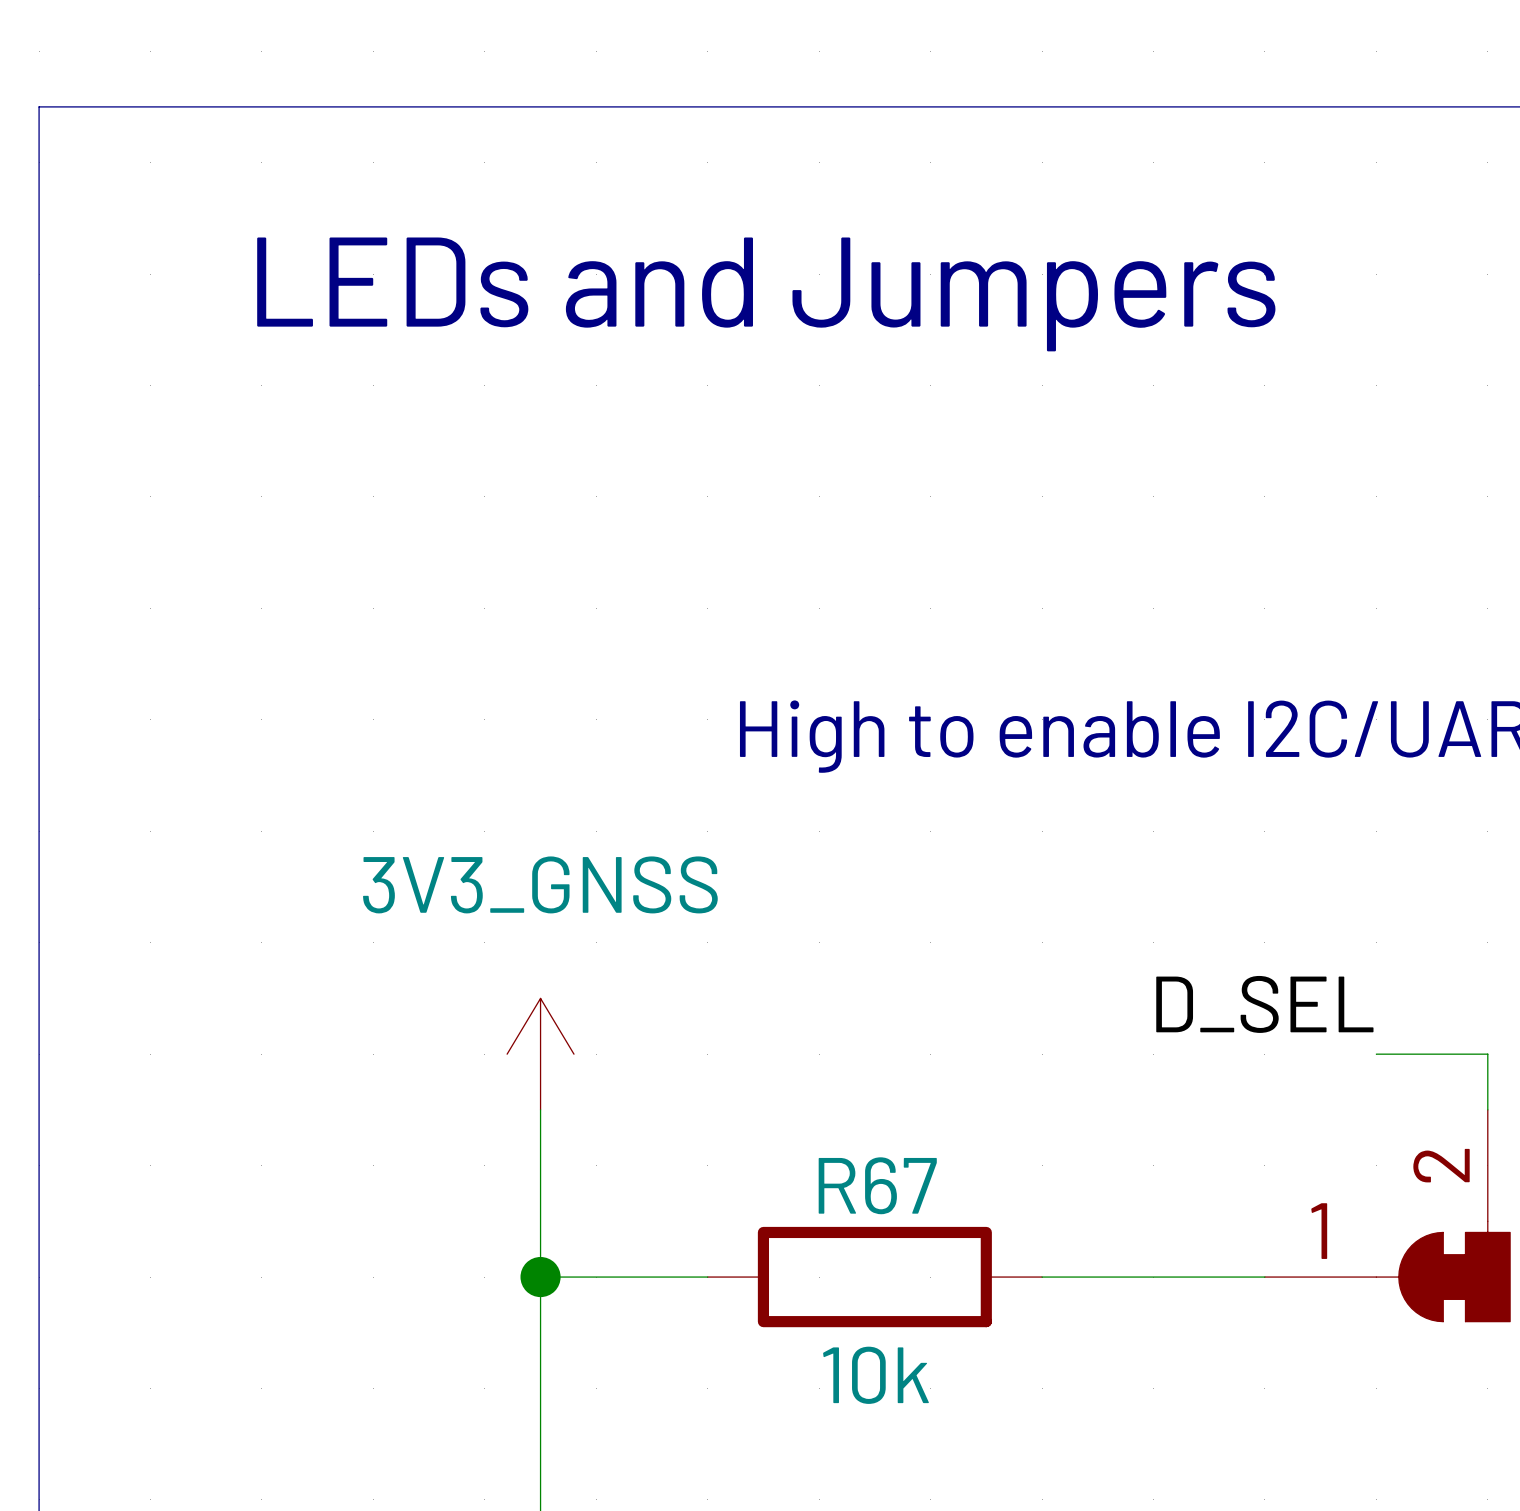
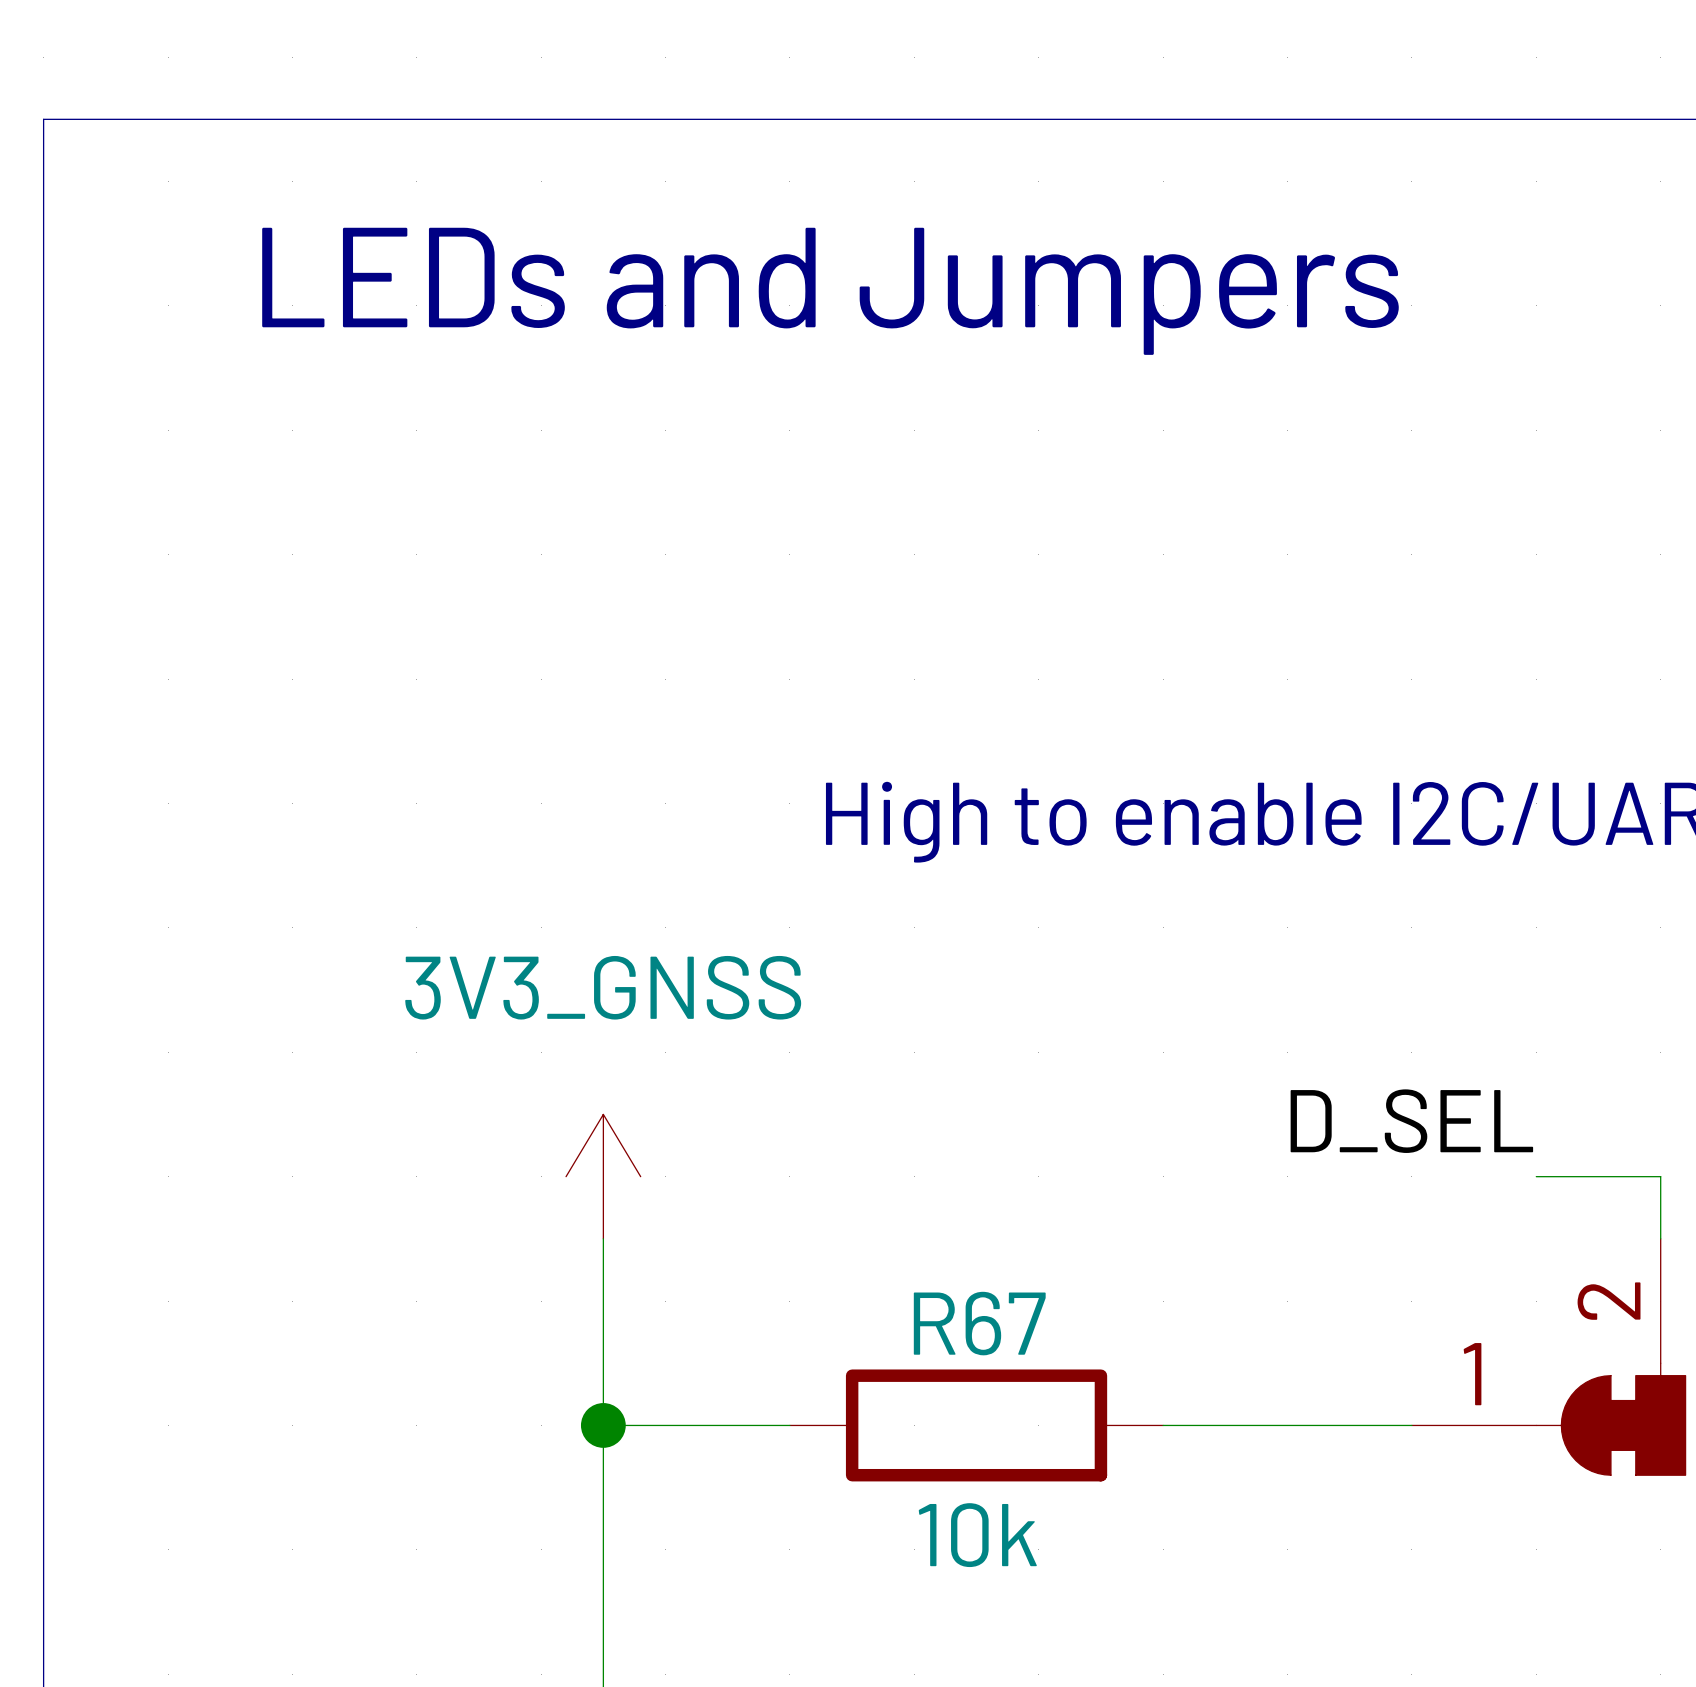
text position: LEDs and Jumpers (766, 294) -> LEDs and Jumpers (830, 291)

